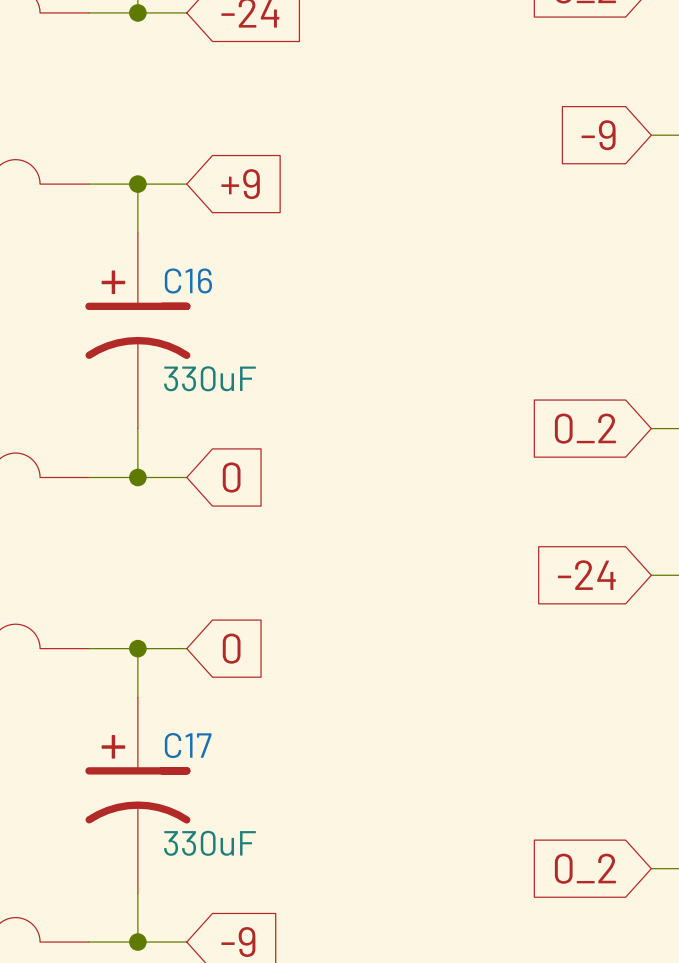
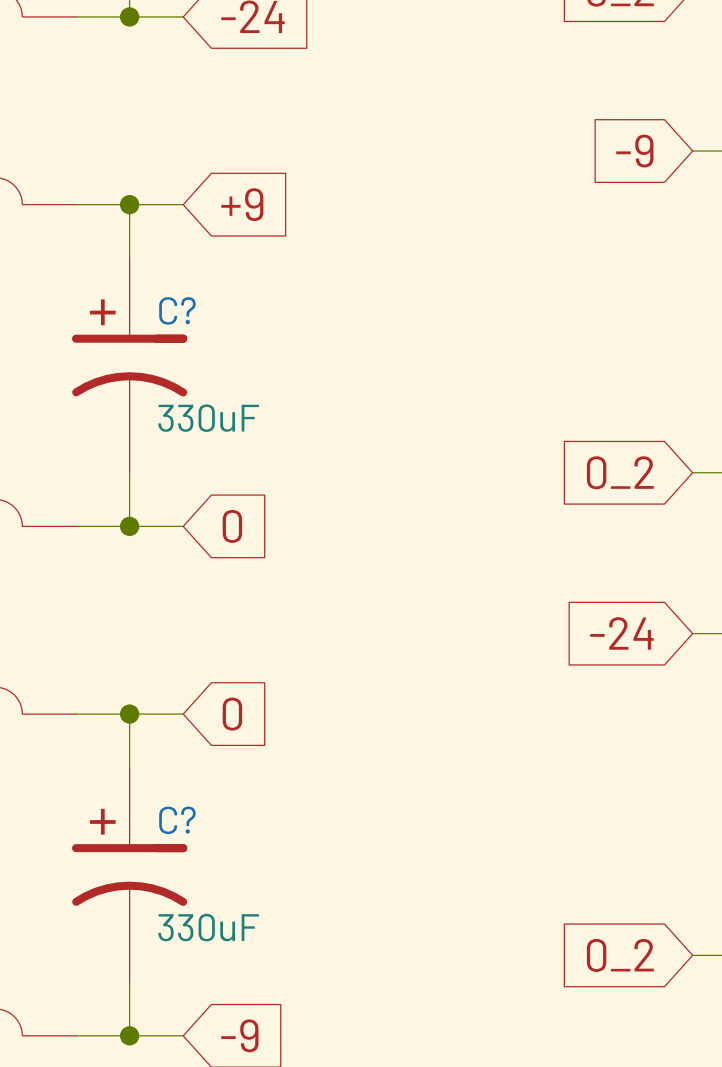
C16 name: C16 (188, 280) -> C? (177, 310)
C17 name: C17 (188, 745) -> C? (177, 820)

